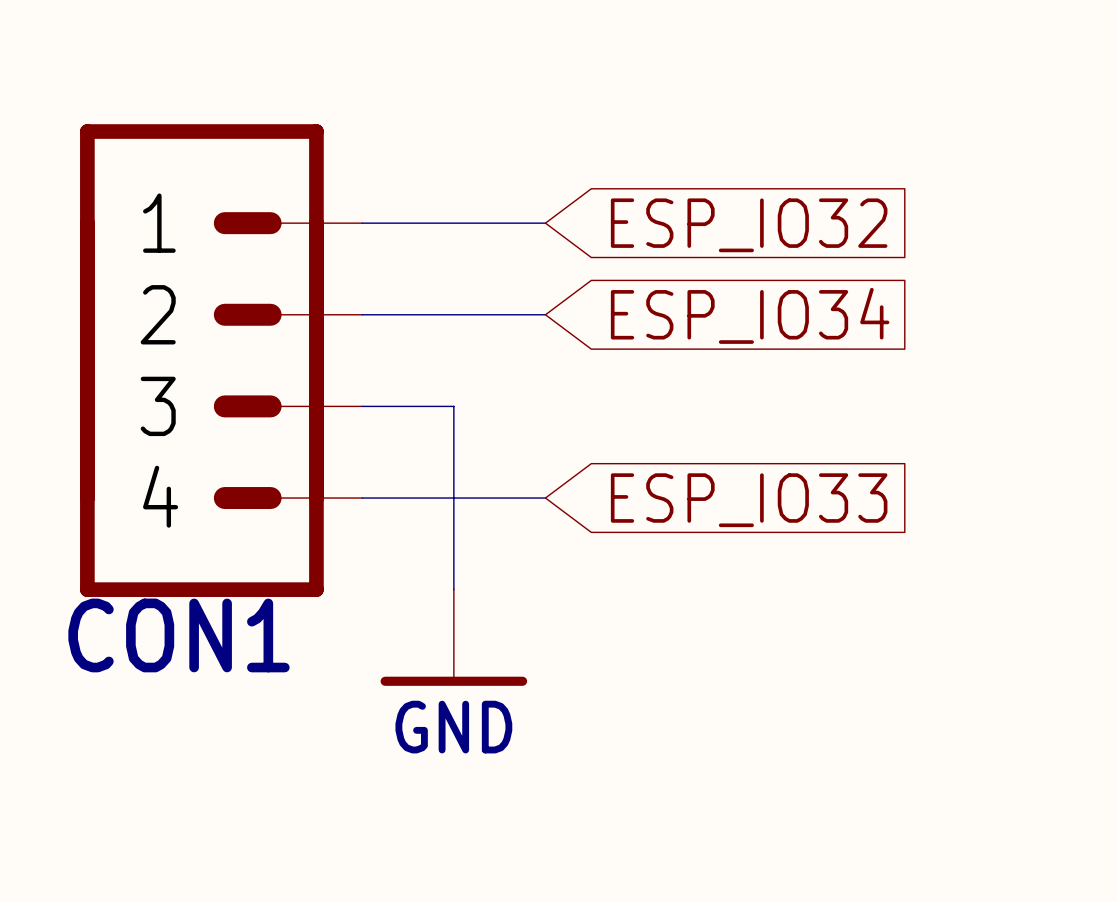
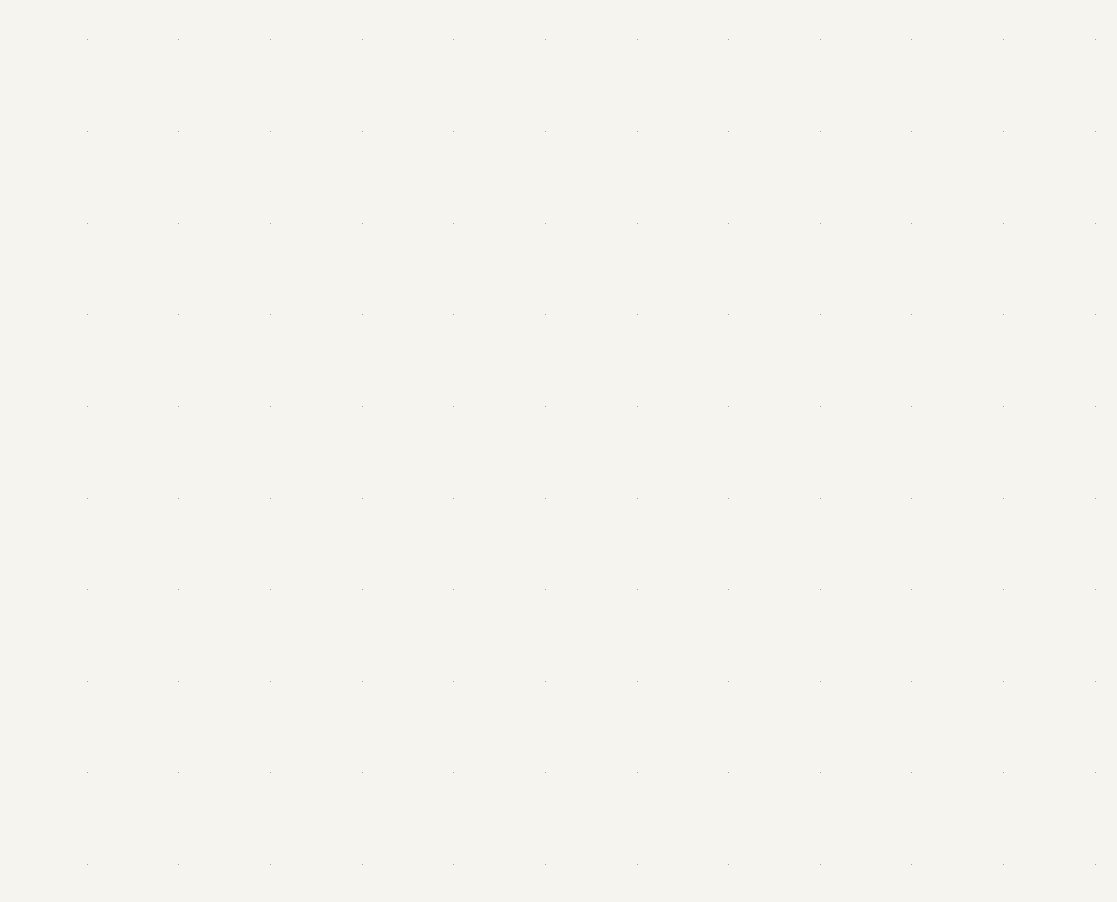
wire: (362, 223) (545, 223) -> none
global label: ESP_IO32 (749, 225) -> none
wire: (362, 314) (545, 314) -> none
global label: ESP_IO34 (750, 315) -> none
CON1: (221, 360) -> none
wire: (362, 406) (453, 406) (453, 589) -> none
wire: (362, 498) (545, 498) -> none
global label: ESP_IO33 (749, 500) -> none
power symbol: GND (453, 637) -> none

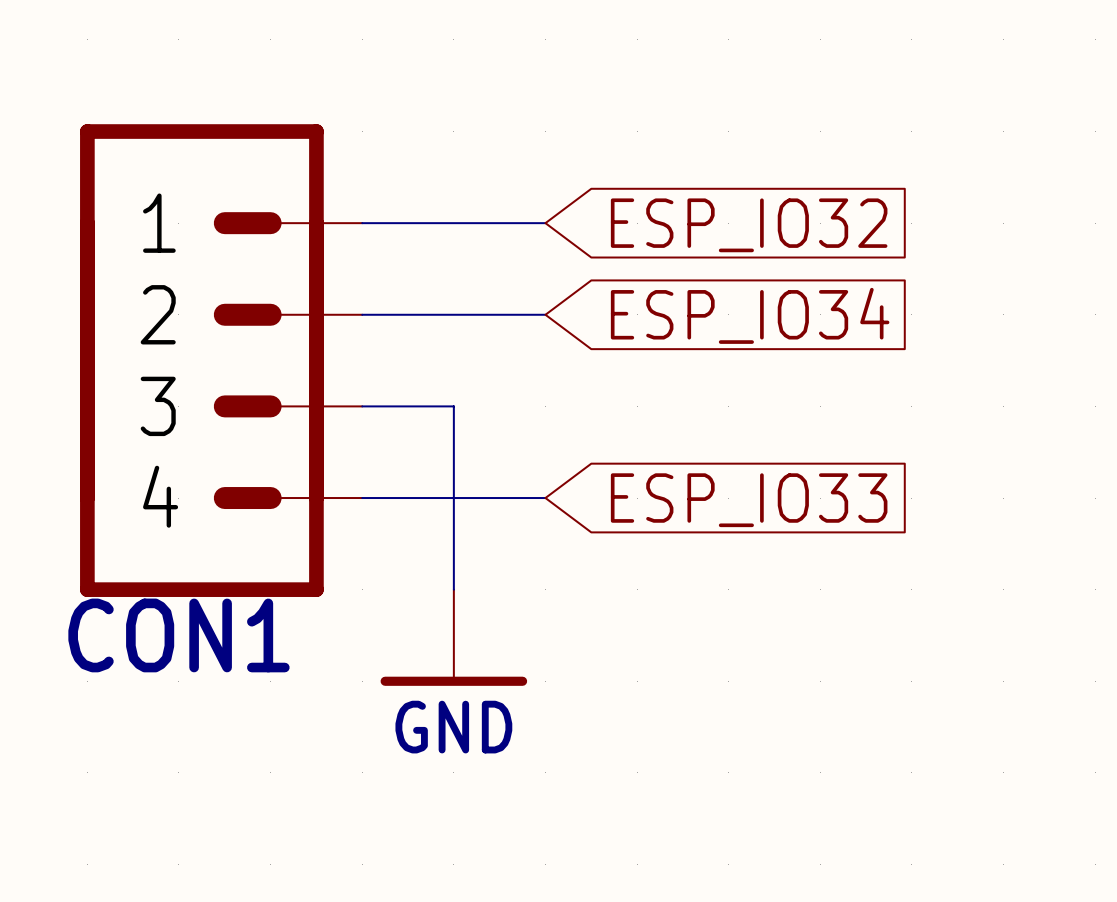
wire: none -> (362, 223) (545, 223)
global label: none -> ESP_IO32 (749, 225)
wire: none -> (362, 314) (545, 314)
global label: none -> ESP_IO34 (750, 315)
CON1: none -> (221, 360)
wire: none -> (362, 406) (453, 406) (453, 589)
wire: none -> (362, 498) (545, 498)
global label: none -> ESP_IO33 (749, 500)
power symbol: none -> GND (453, 637)

